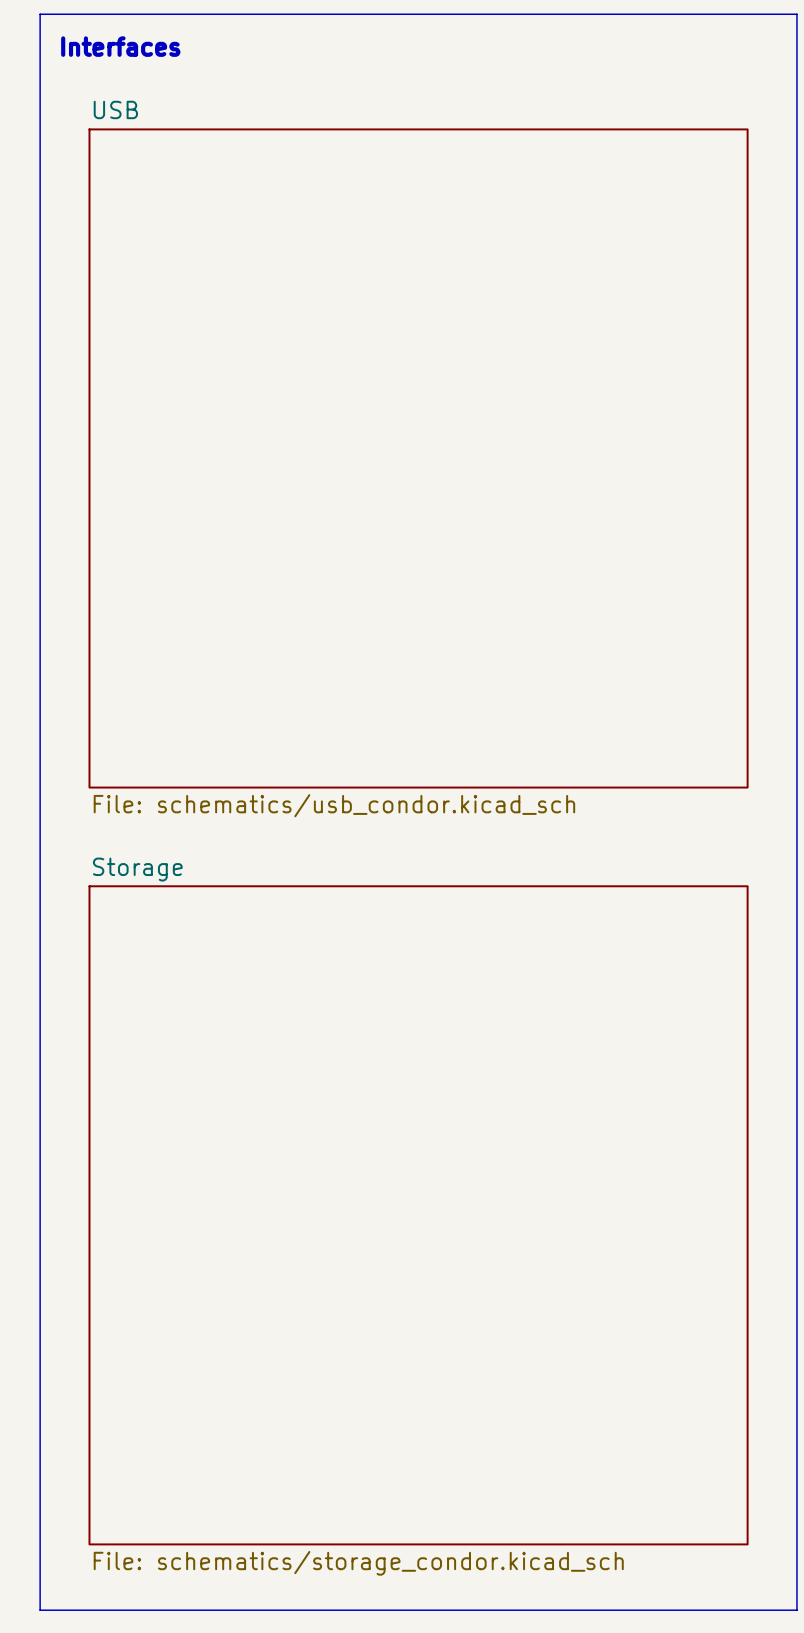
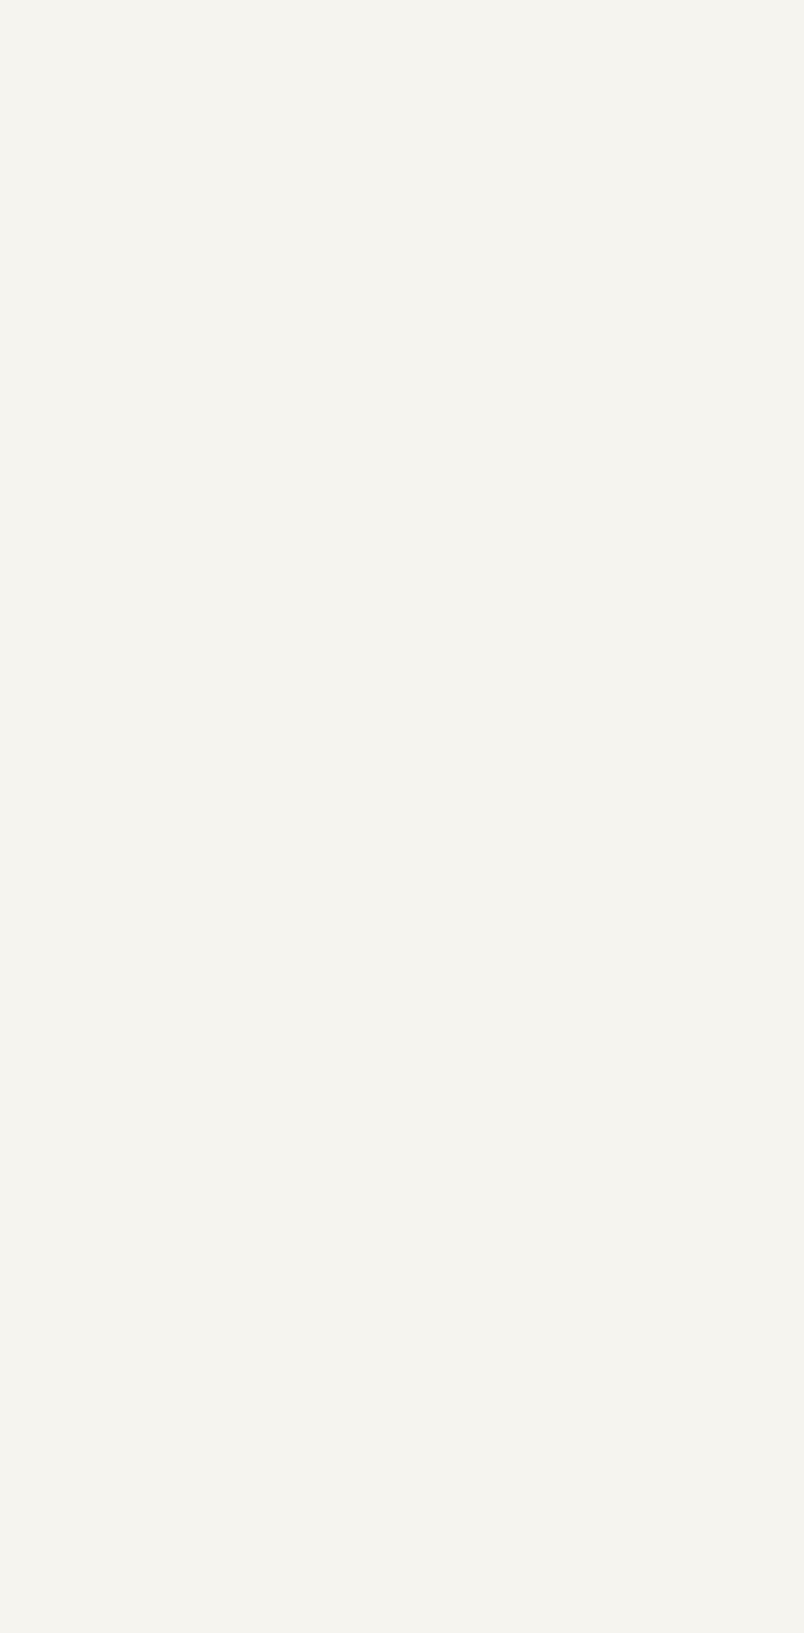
line: (40, 14) (796, 14) (796, 1610) (40, 1610) (40, 14) -> none
text: Interfaces (120, 46) -> none
sheet USB: File: schematics/usb_condor.kicad_sch (418, 458) -> none
sheet Storage: File: schematics/storage_condor.kicad_sch (418, 1215) -> none

